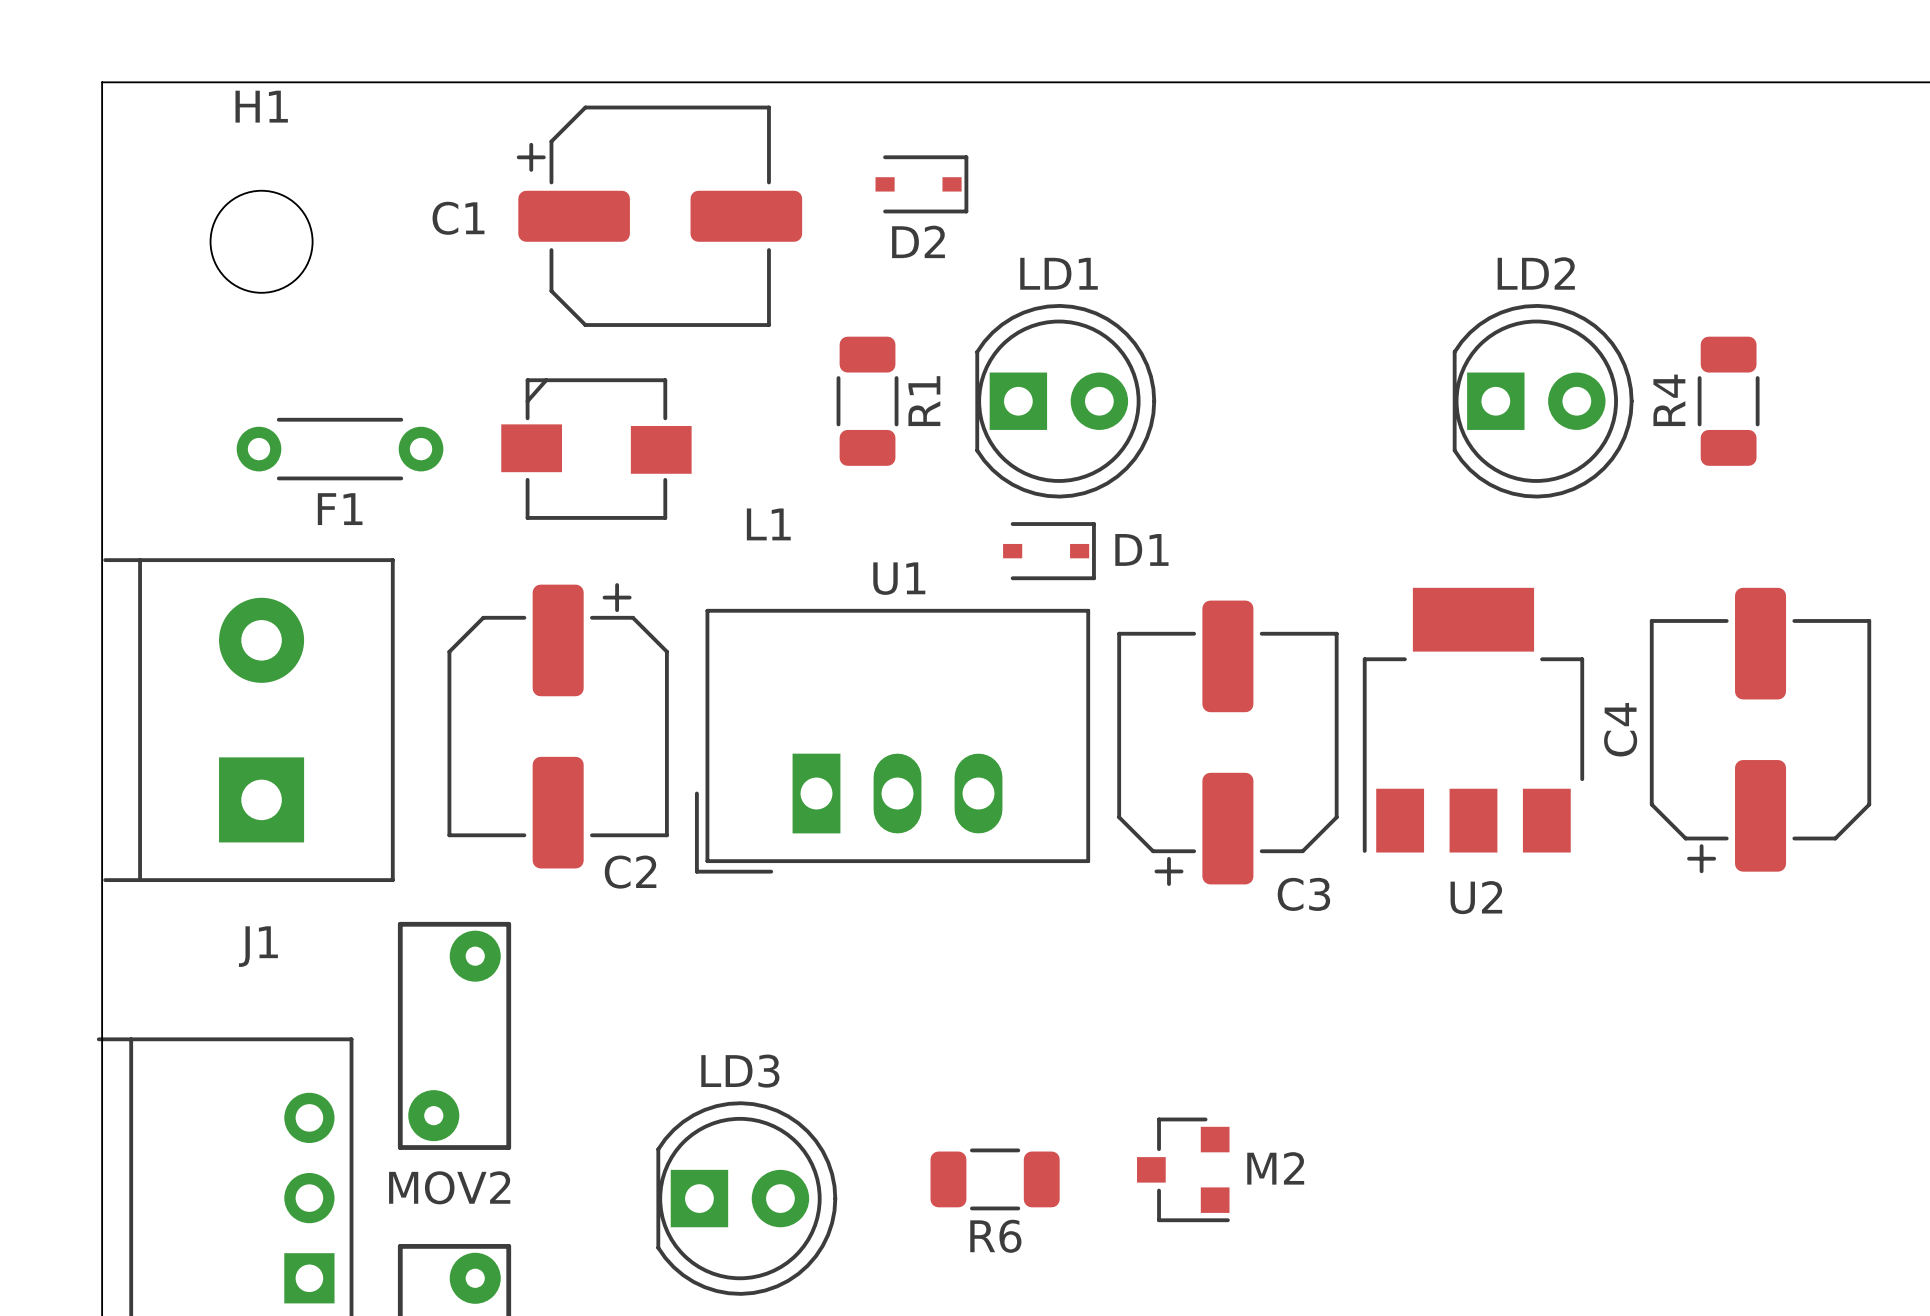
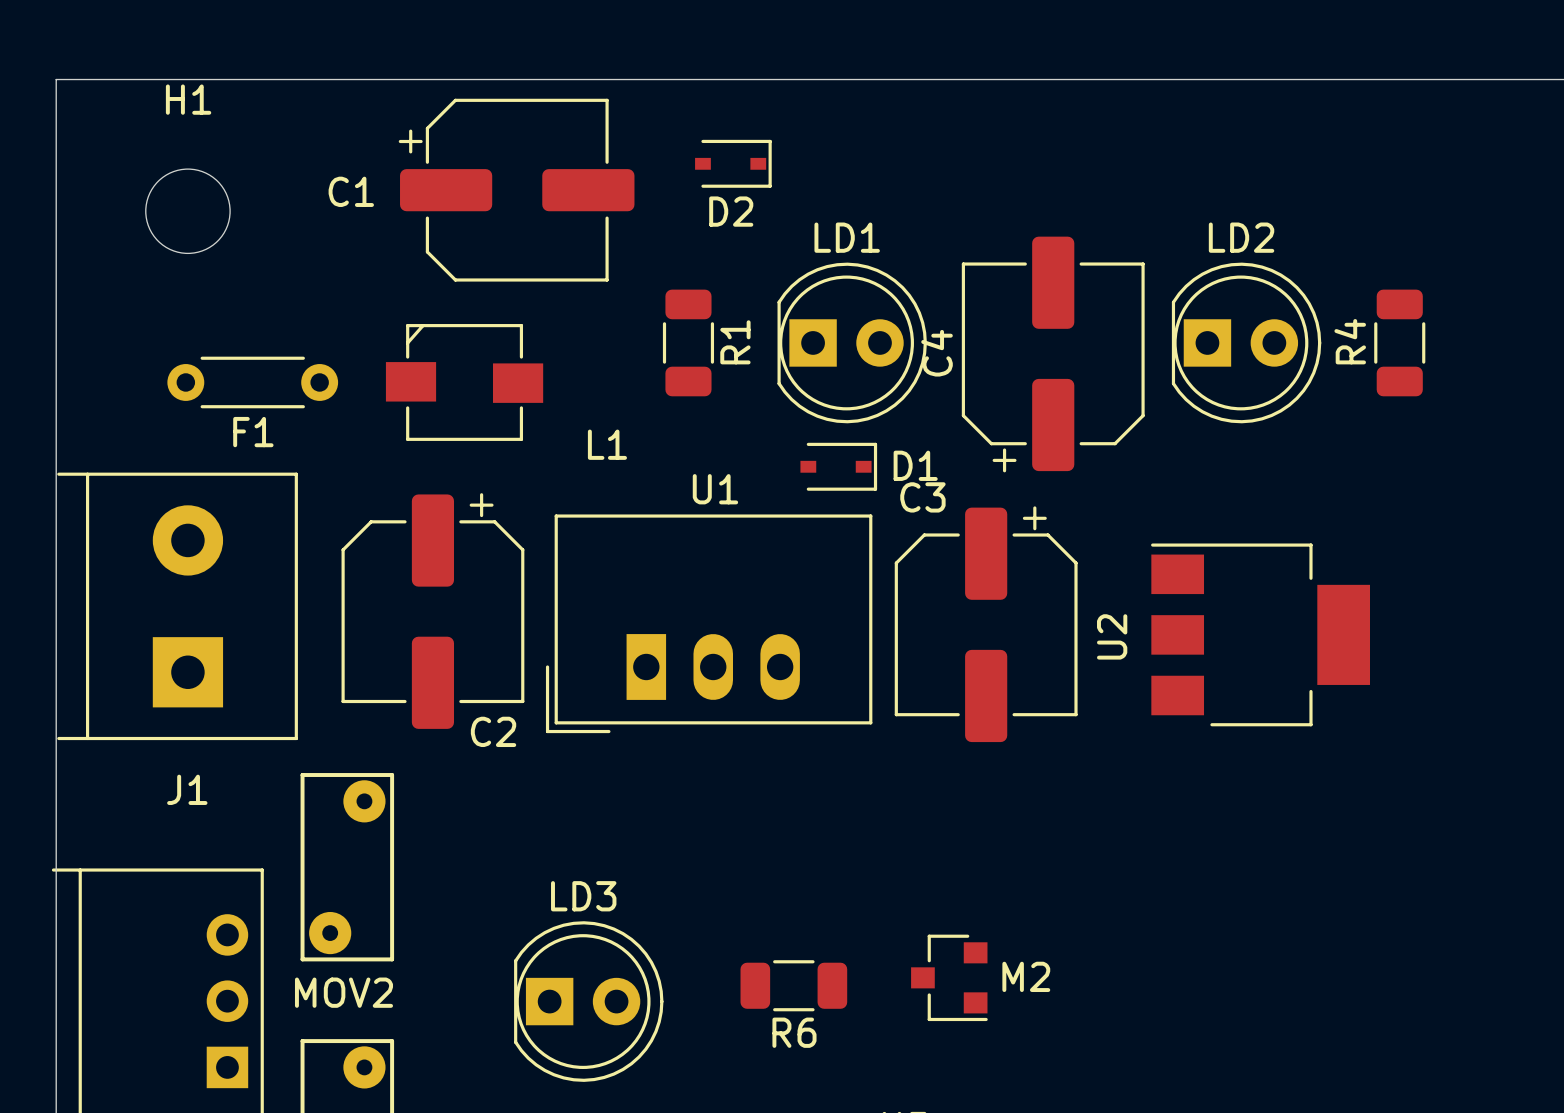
C3 footprint: [1117, 600, 1339, 886] -> [894, 506, 1078, 743]
U2 rotation: 0° (1473, 720) -> 90° clockwise (1260, 634)
C4 position: (1760, 730) -> (1053, 354)
C3 name position: C3 (1303, 894) -> C3 (922, 497)

